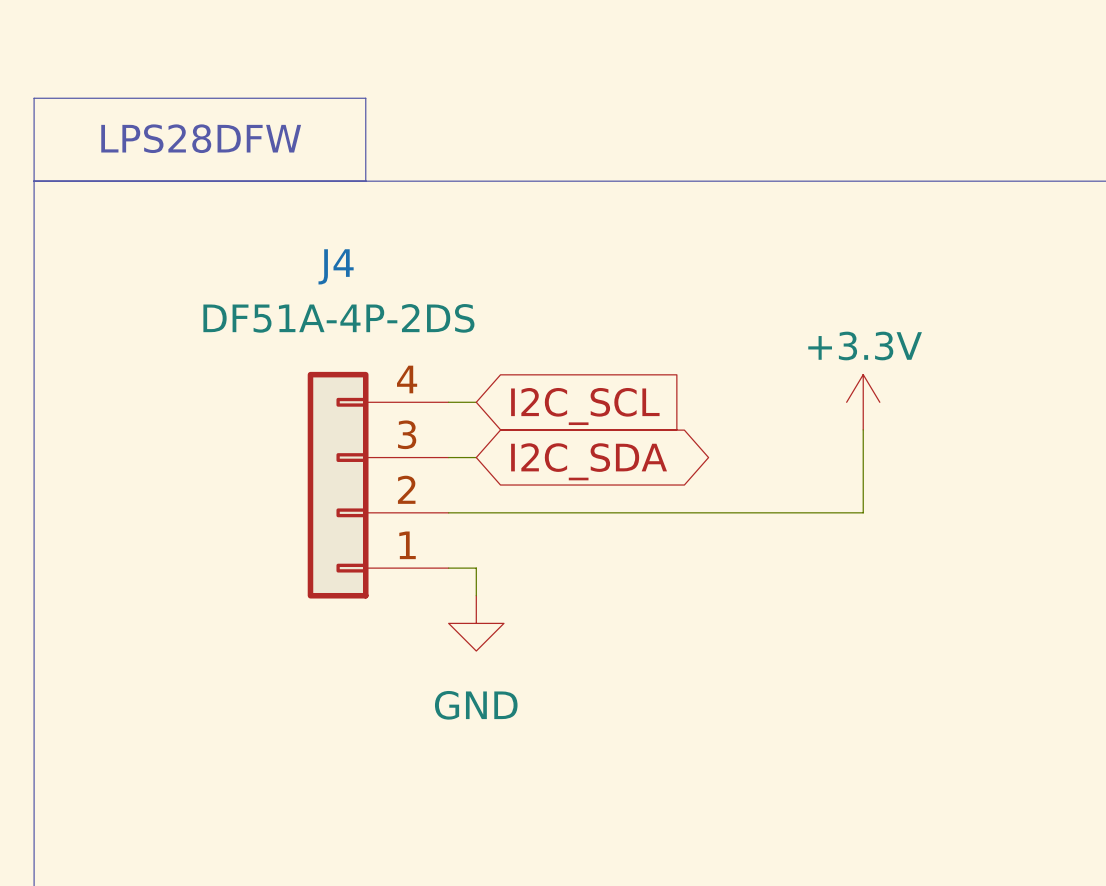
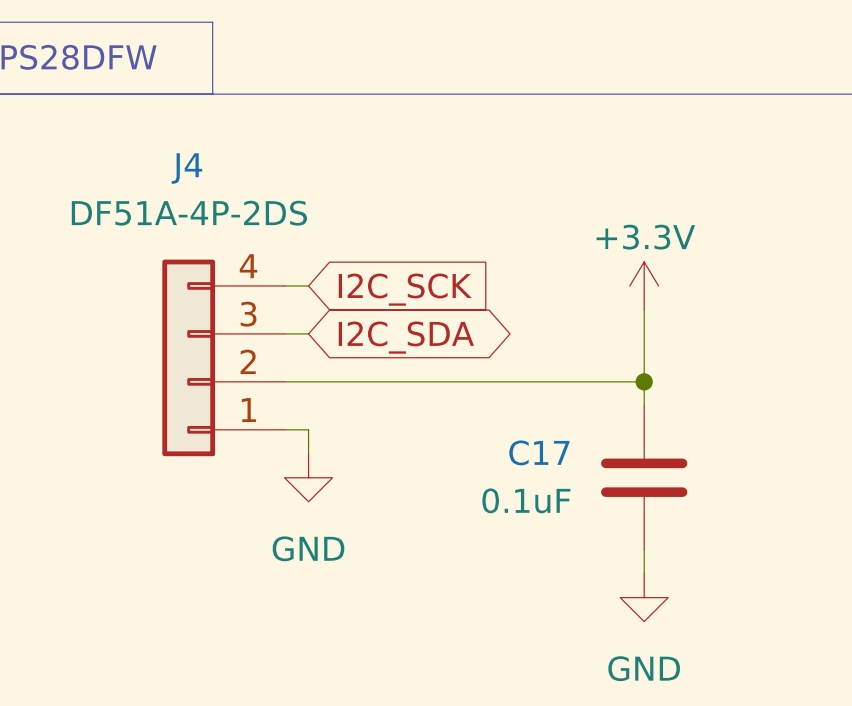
global label: I2C_SCL (585, 406) -> I2C_SCK (405, 289)
wire: none -> (644, 381) (644, 405)
junction: none -> (644, 381)
C17: none -> 0.1uF (644, 477)
wire: none -> (644, 549) (644, 573)
power symbol: none -> GND (644, 597)

